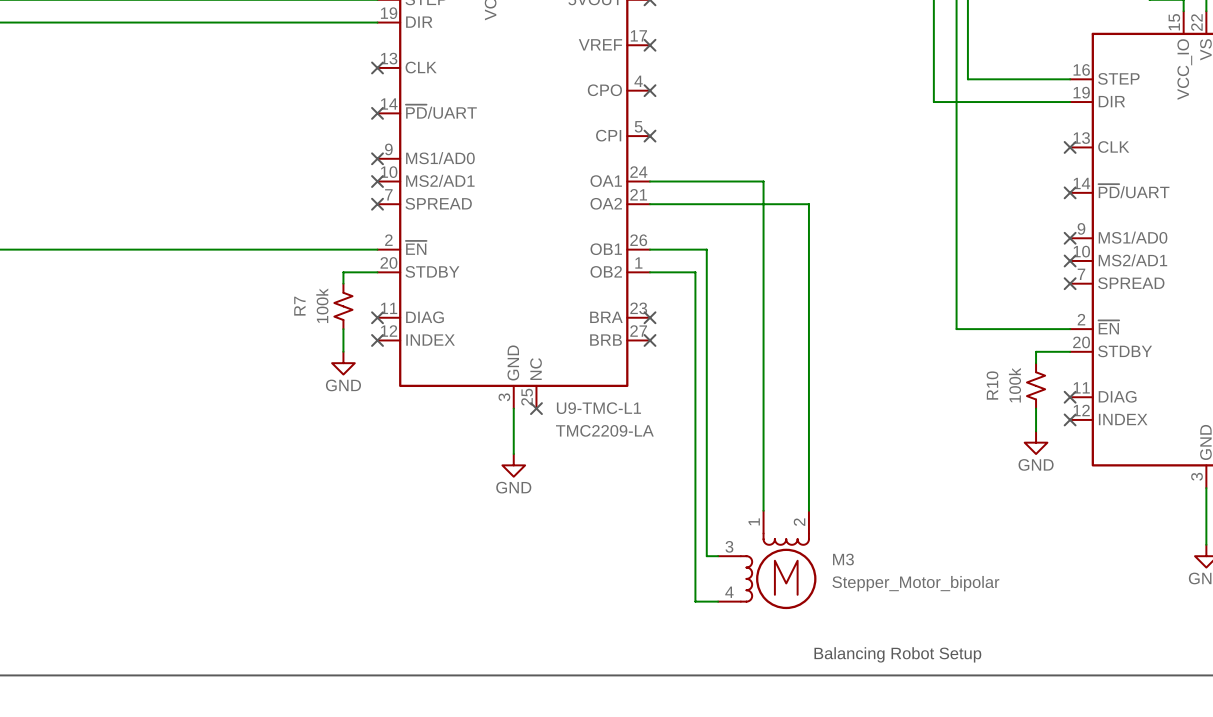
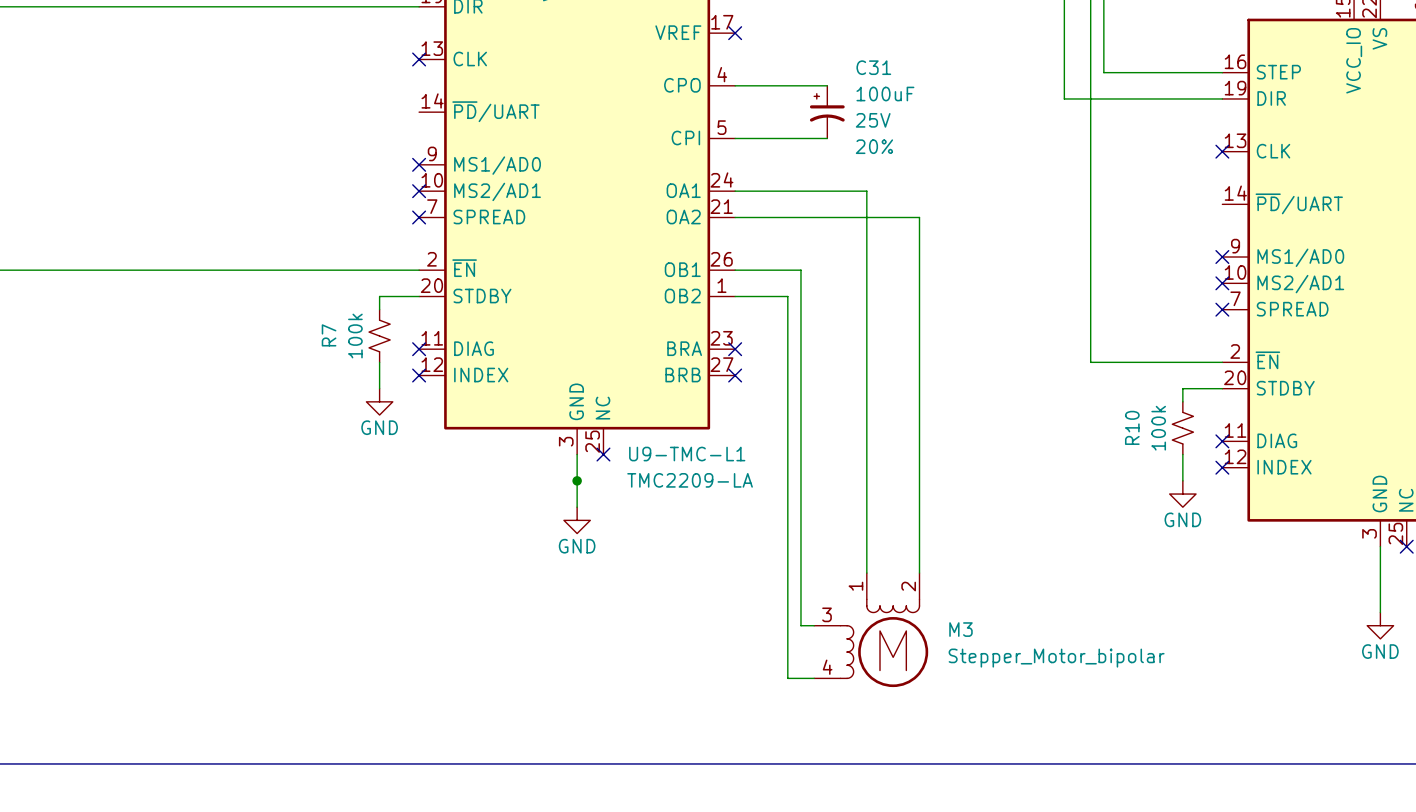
wire: none -> (735, 85) (827, 85)
no-connect mark: (650, 90) -> none
no-connect mark: (377, 113) -> none
C31: none -> 100uF (827, 112)
wire: none -> (735, 138) (827, 138)
no-connect mark: (650, 136) -> none
no-connect mark: (1070, 192) -> none
junction: none -> (577, 480)
text: Balancing Robot Setup (897, 654) -> none

